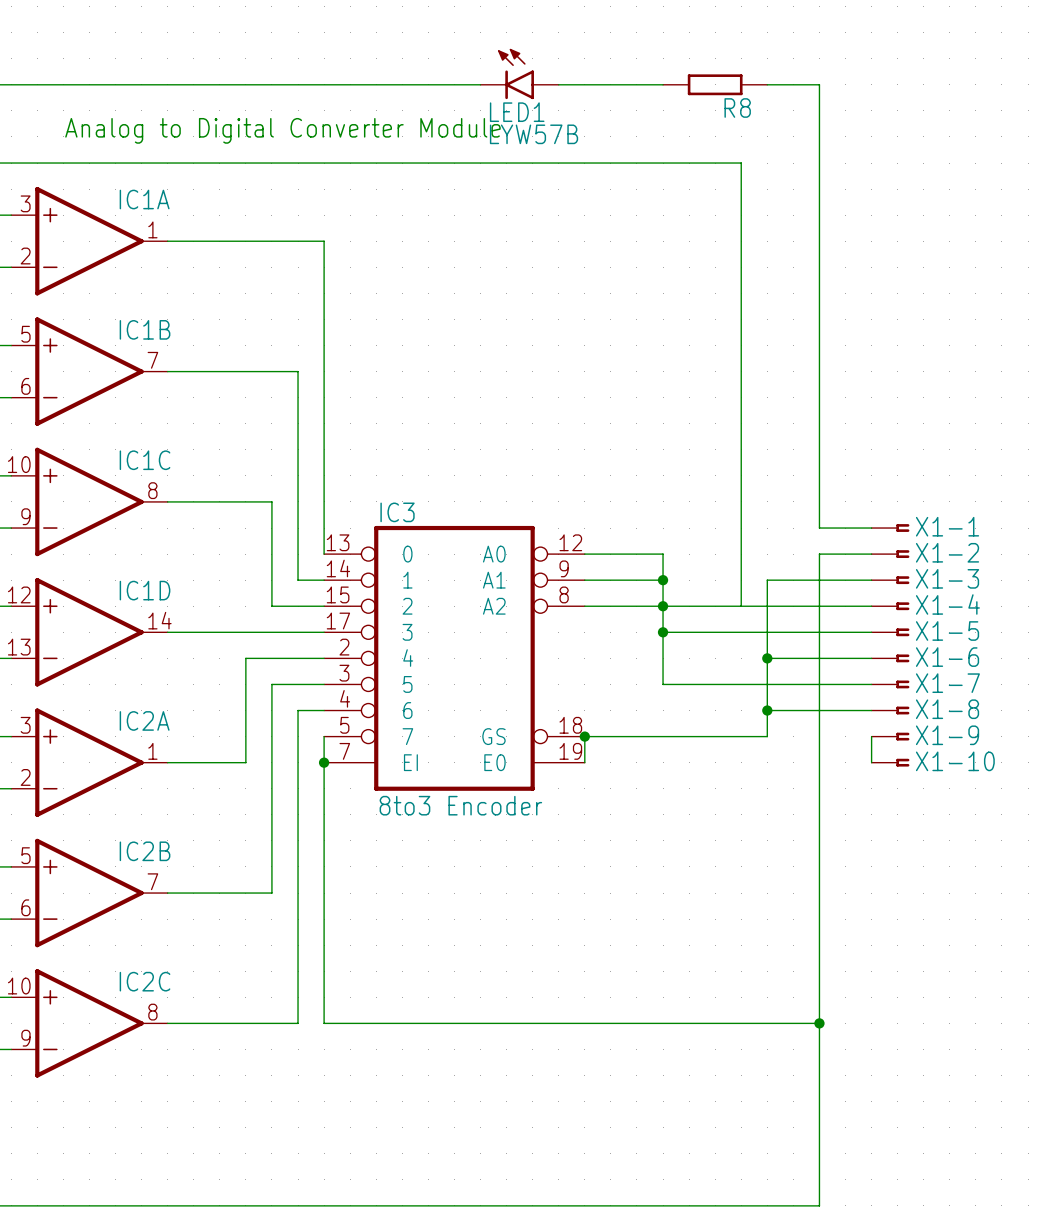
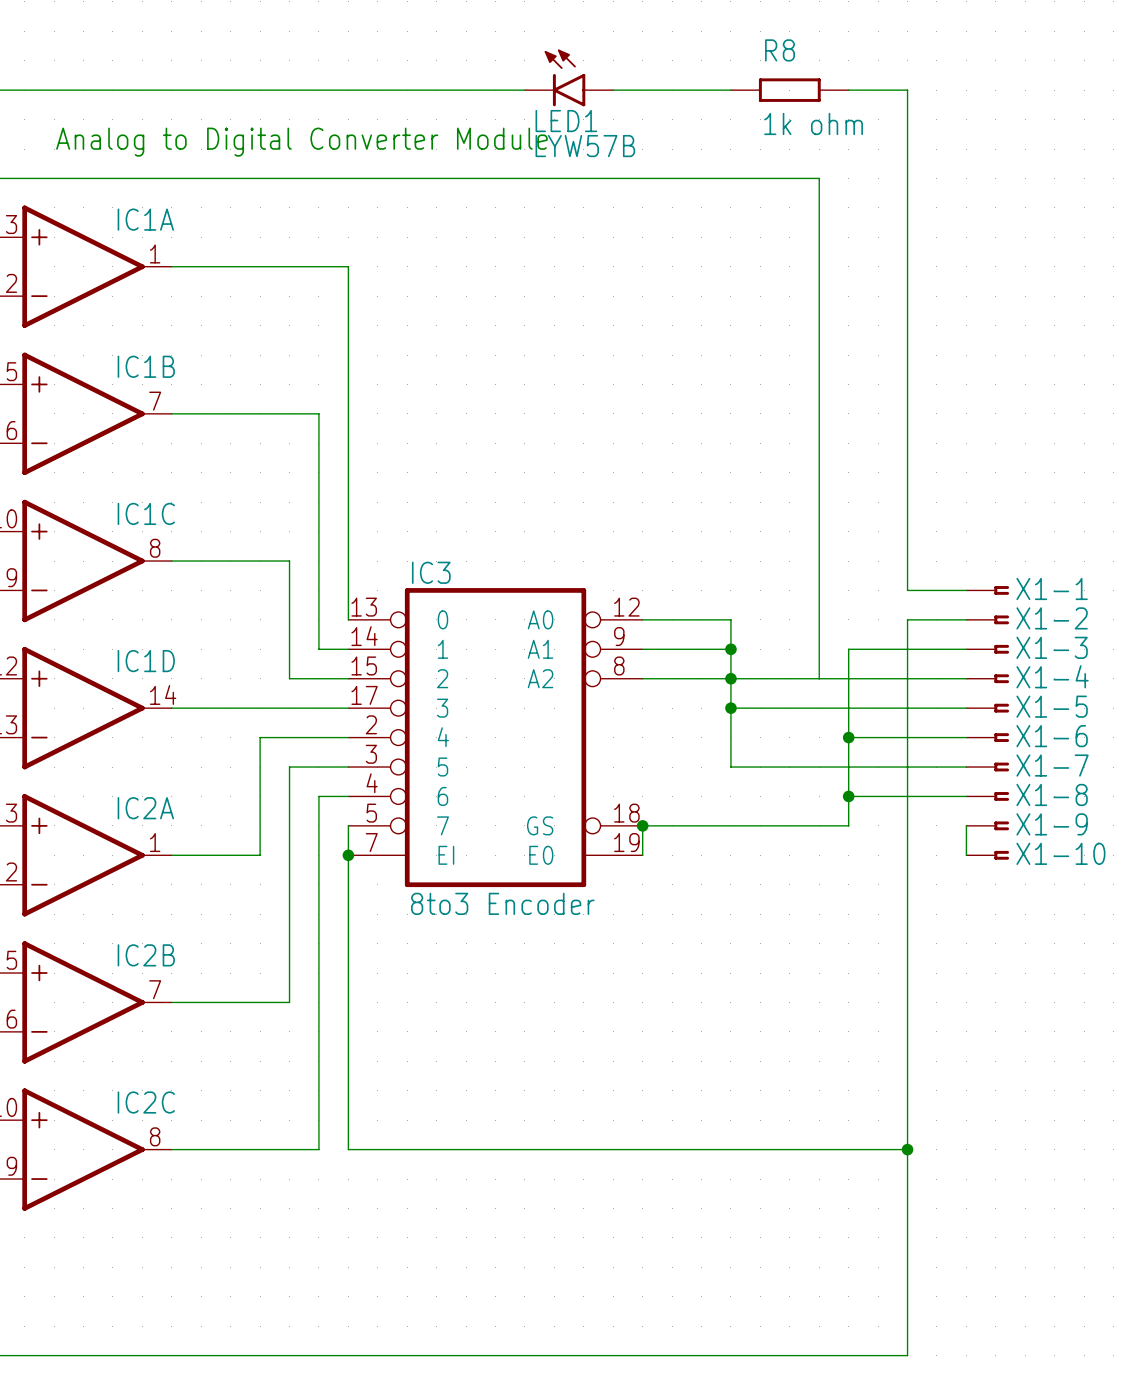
R8 name position: R8 (737, 108) -> R8 (780, 50)
R8 value: none -> 1k ohm (813, 123)

